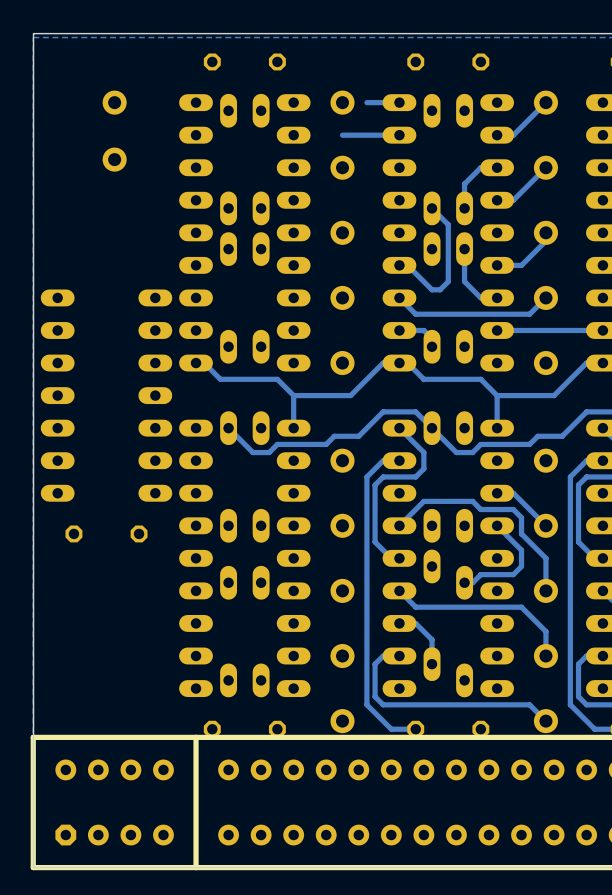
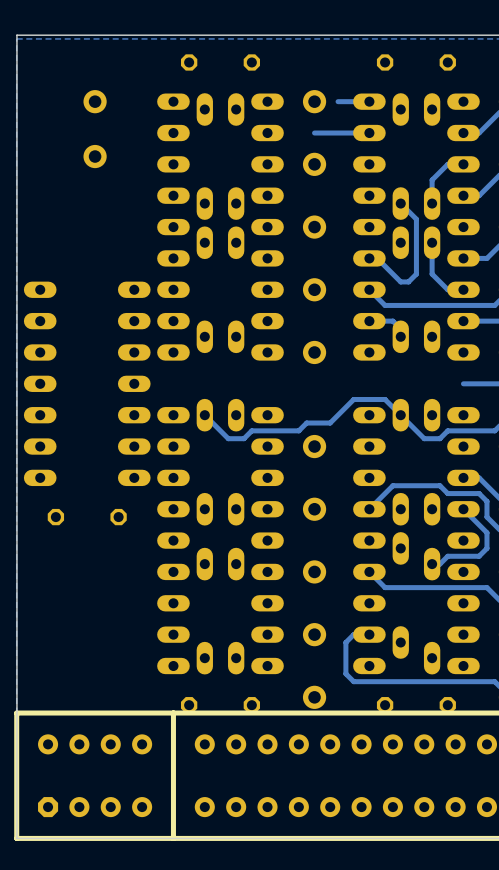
track: (196, 363) (204, 363) (220, 379) (277, 379) (293, 395) -> none
track: (293, 395) (350, 395) (383, 363) (407, 363) (423, 379) (480, 379) (497, 395) (497, 428) -> none
track: (293, 395) (293, 428) -> none
track: (399, 428) (423, 452) (423, 468) (415, 476) (383, 476) (375, 485) (375, 542) (391, 558) (399, 558) -> none
track: (399, 460) (383, 460) (366, 476) (366, 704) (391, 729) (415, 729) -> none
track: (399, 623) (415, 623) (432, 639) (432, 664) -> none

